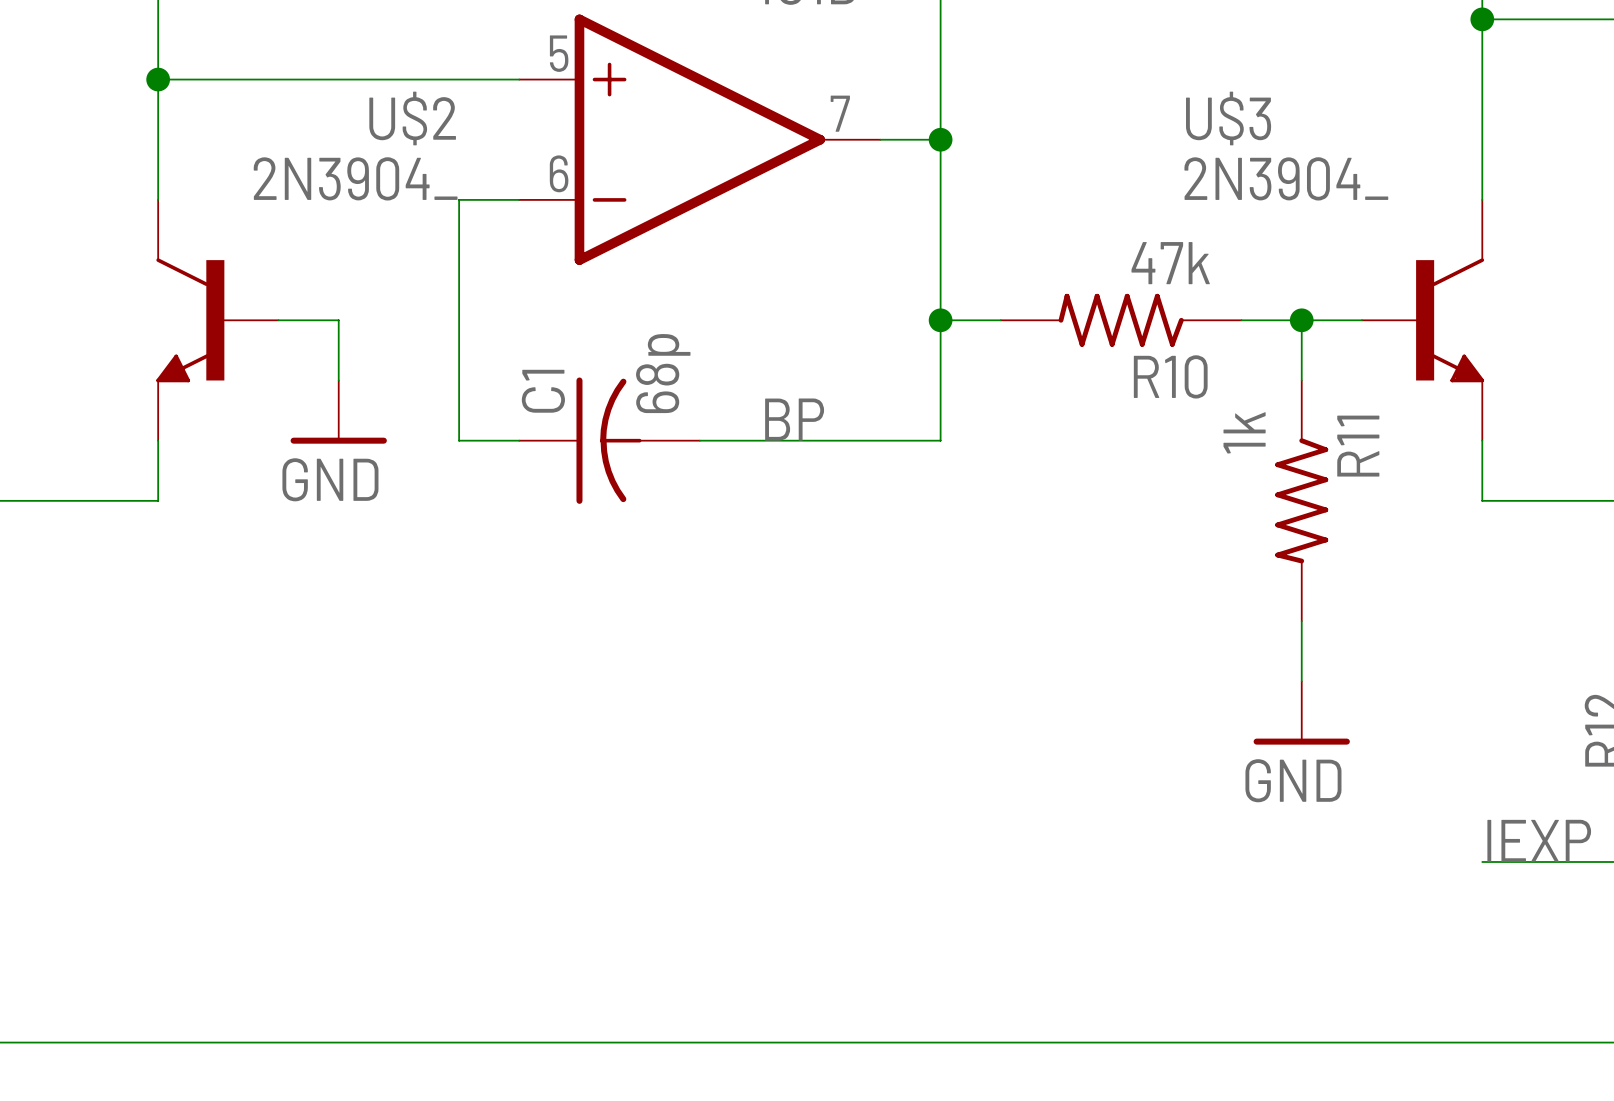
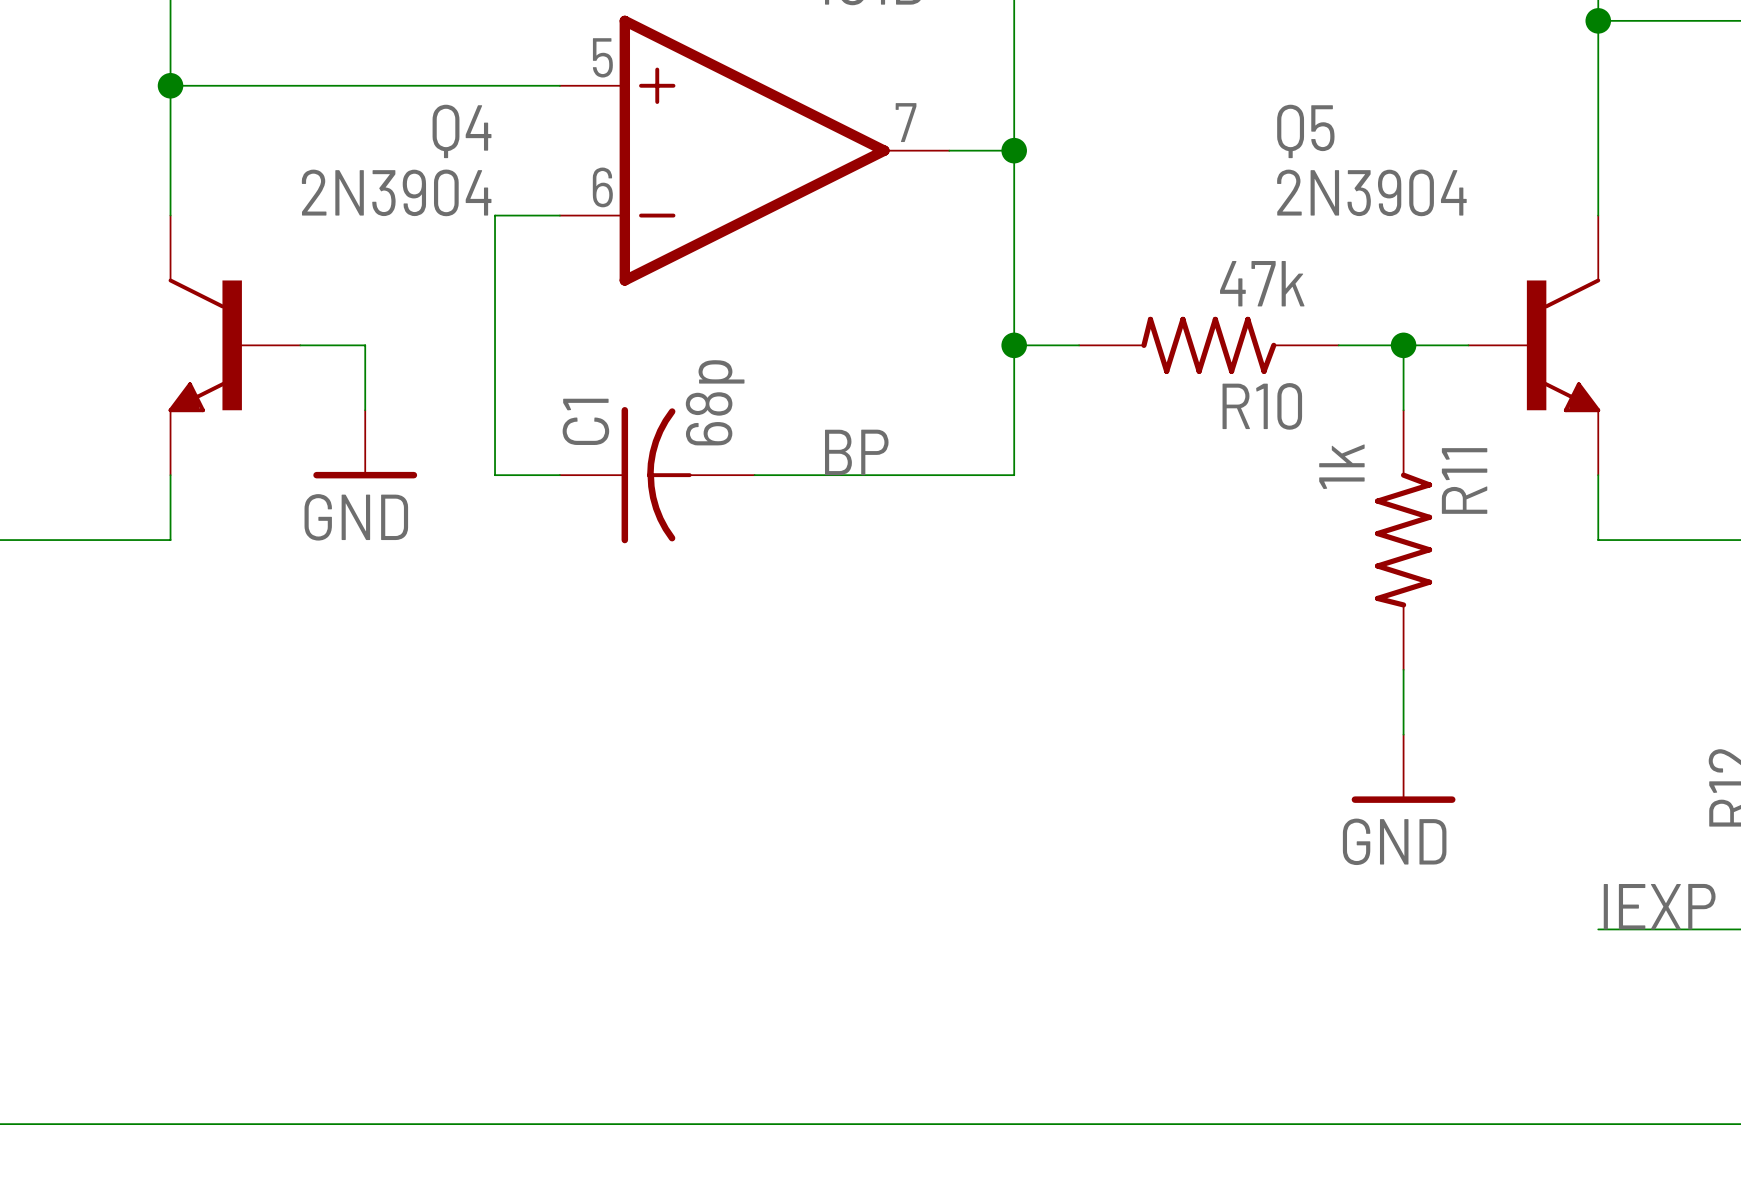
U$2 name: U$2 (412, 118) -> Q4 (462, 131)
U$3 name: U$3 (1228, 118) -> Q5 (1305, 131)
U$2 value: 2N3904_ (355, 178) -> 2N3904 (396, 192)
U$3 value: 2N3904_ (1286, 178) -> 2N3904 (1371, 192)

